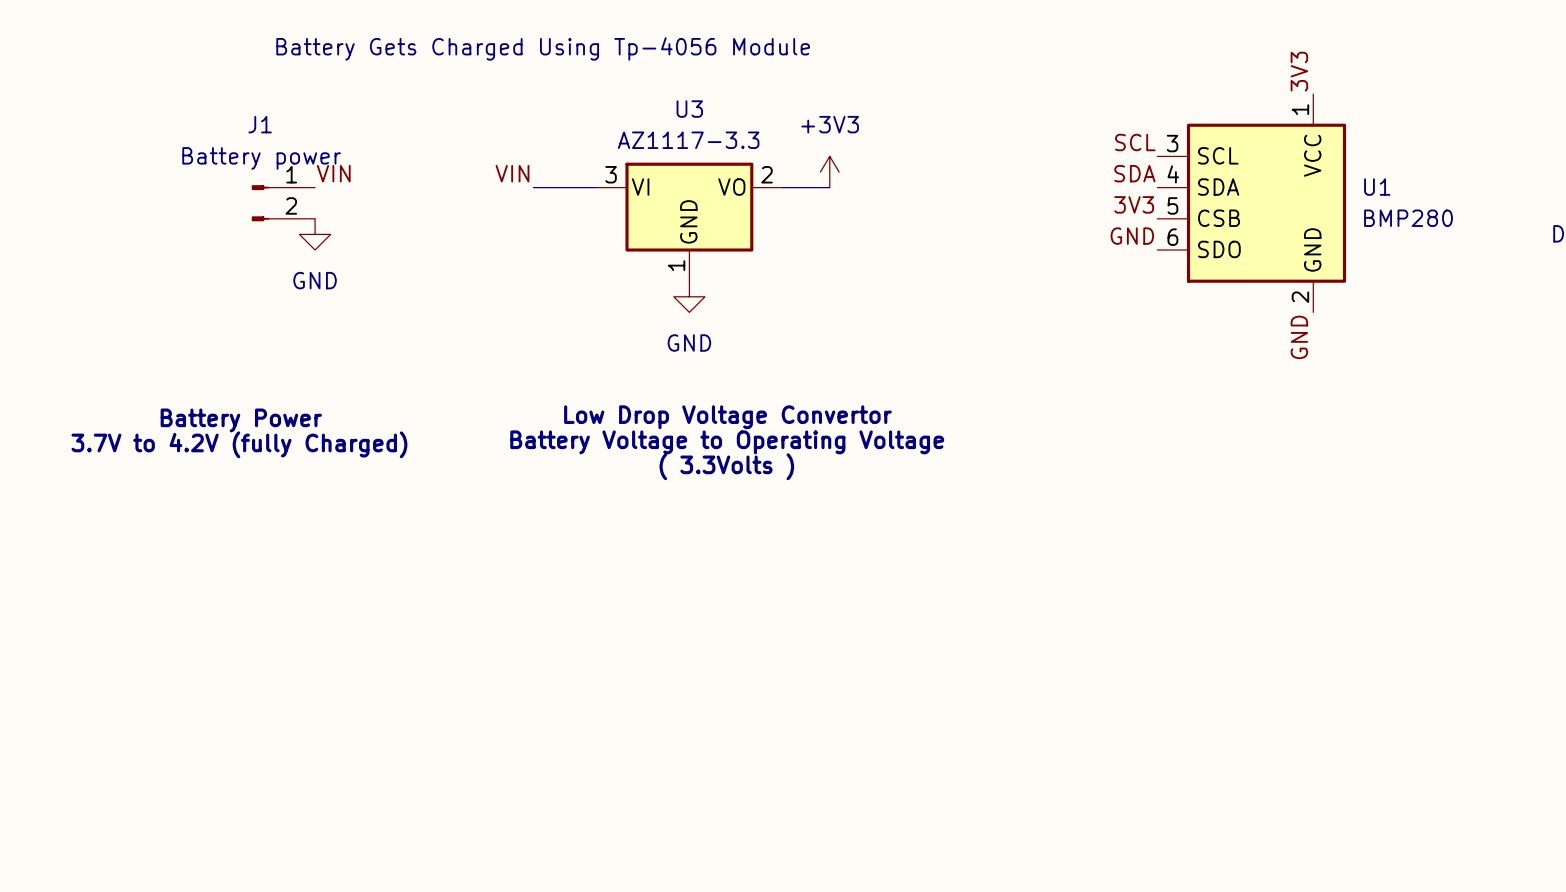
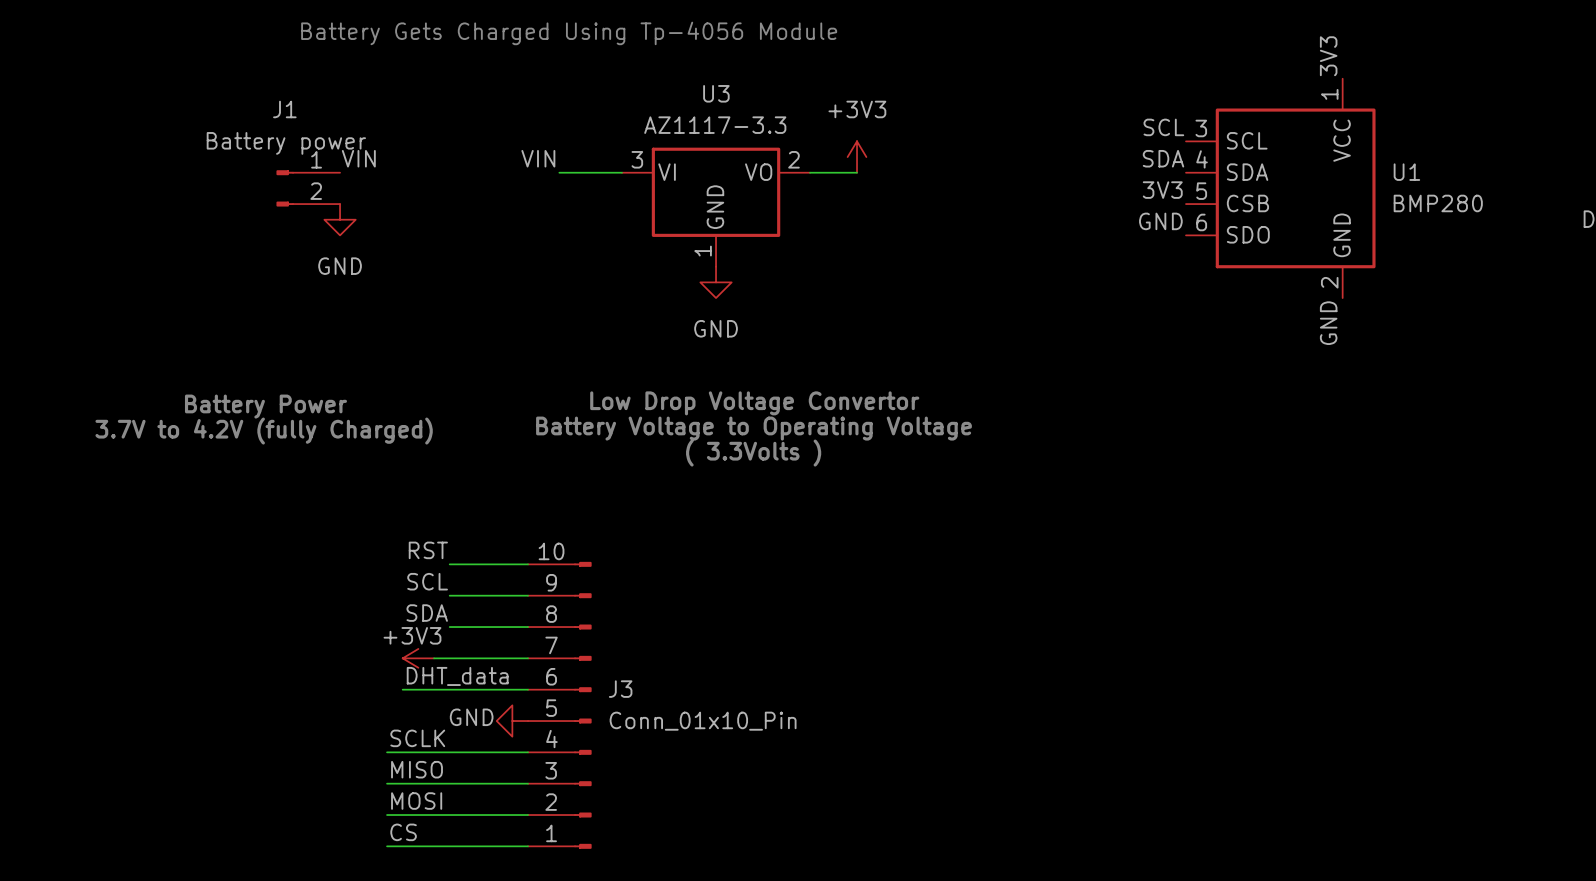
label: none -> RST (428, 550)
wire: none -> (449, 564) (528, 564)
label: none -> SCL (427, 581)
wire: none -> (449, 595) (528, 595)
label: none -> SDA (427, 613)
wire: none -> (449, 627) (528, 627)
power symbol: none -> +3V3 (418, 658)
wire: none -> (434, 658) (528, 658)
label: none -> DHT_data (457, 676)
wire: none -> (402, 689) (528, 689)
J3: none -> Conn_01x10_Pin (559, 705)
power symbol: none -> GND (512, 721)
label: none -> SCLK (417, 738)
wire: none -> (387, 752) (528, 752)
label: none -> MISO (417, 769)
wire: none -> (387, 783) (528, 783)
label: none -> MOSI (416, 801)
wire: none -> (387, 815) (528, 815)
label: none -> CS (403, 832)
wire: none -> (387, 846) (528, 846)

